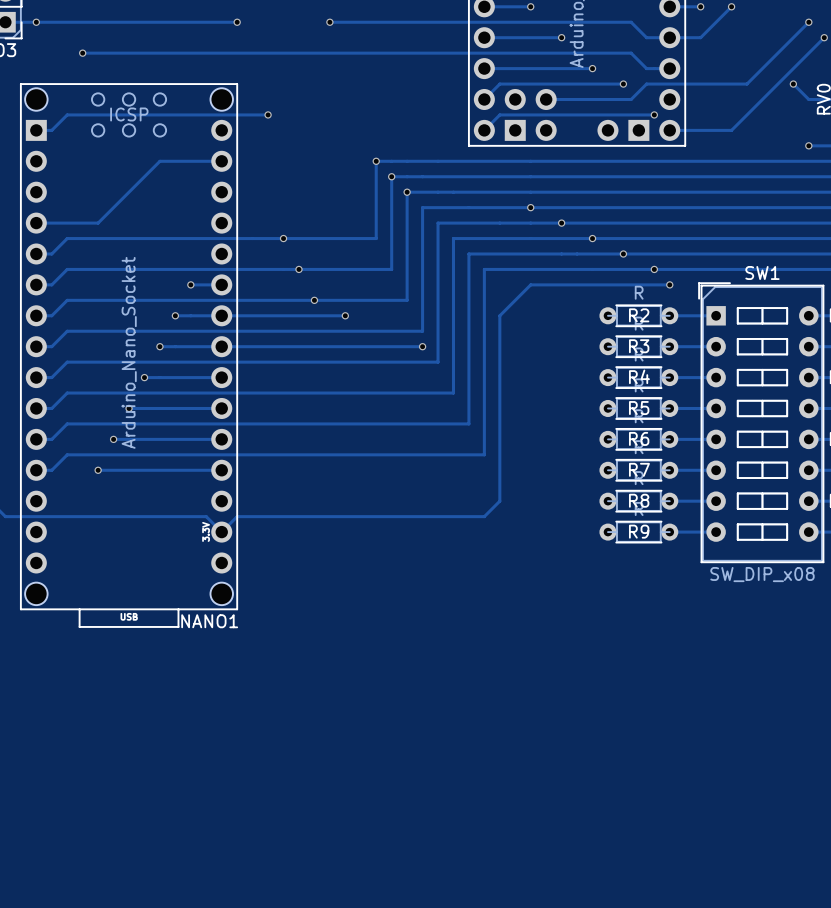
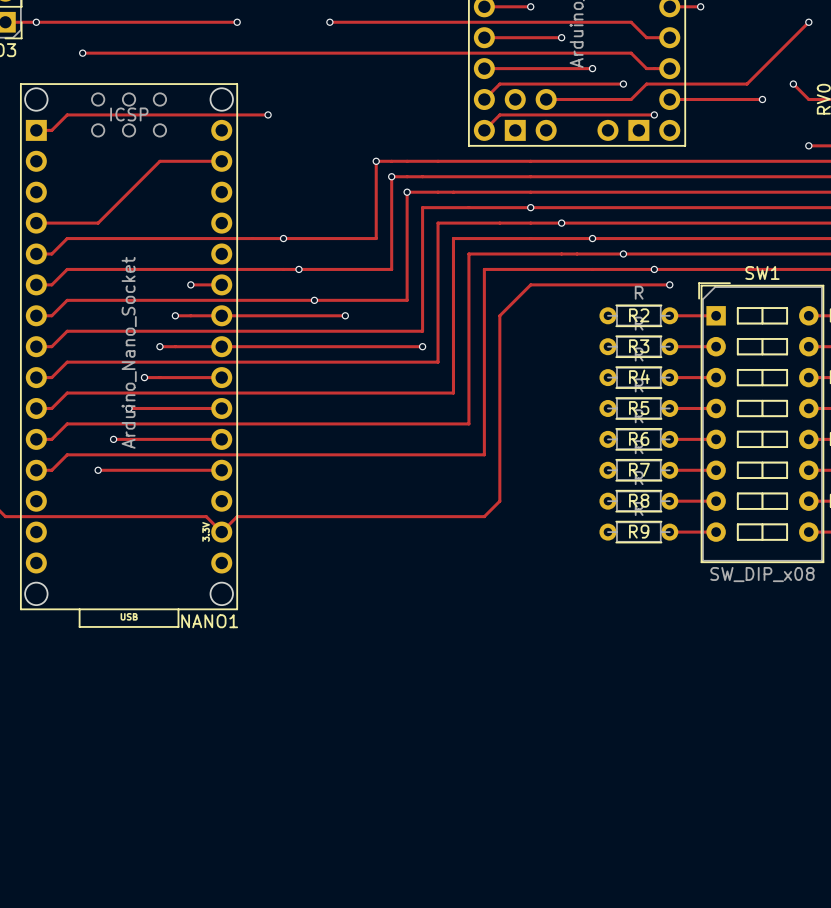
track: (731, 6) (700, 37) (669, 37) -> none
via: (731, 6) -> none
track: (824, 37) (731, 130) (669, 130) -> none
via: (824, 37) -> none
track: none -> (669, 99) (762, 99)
via: none -> (762, 99)

